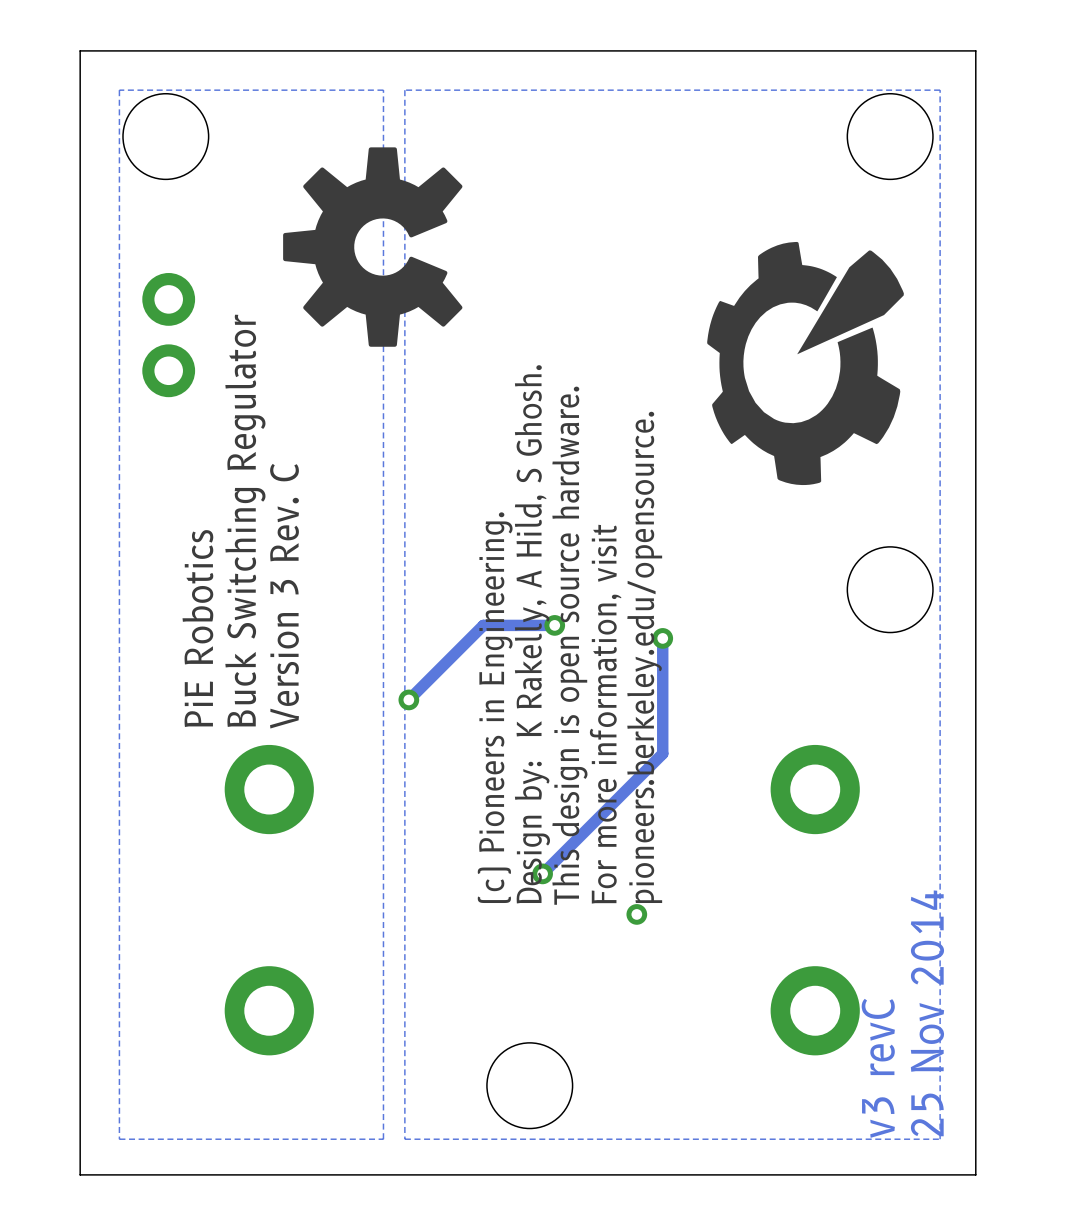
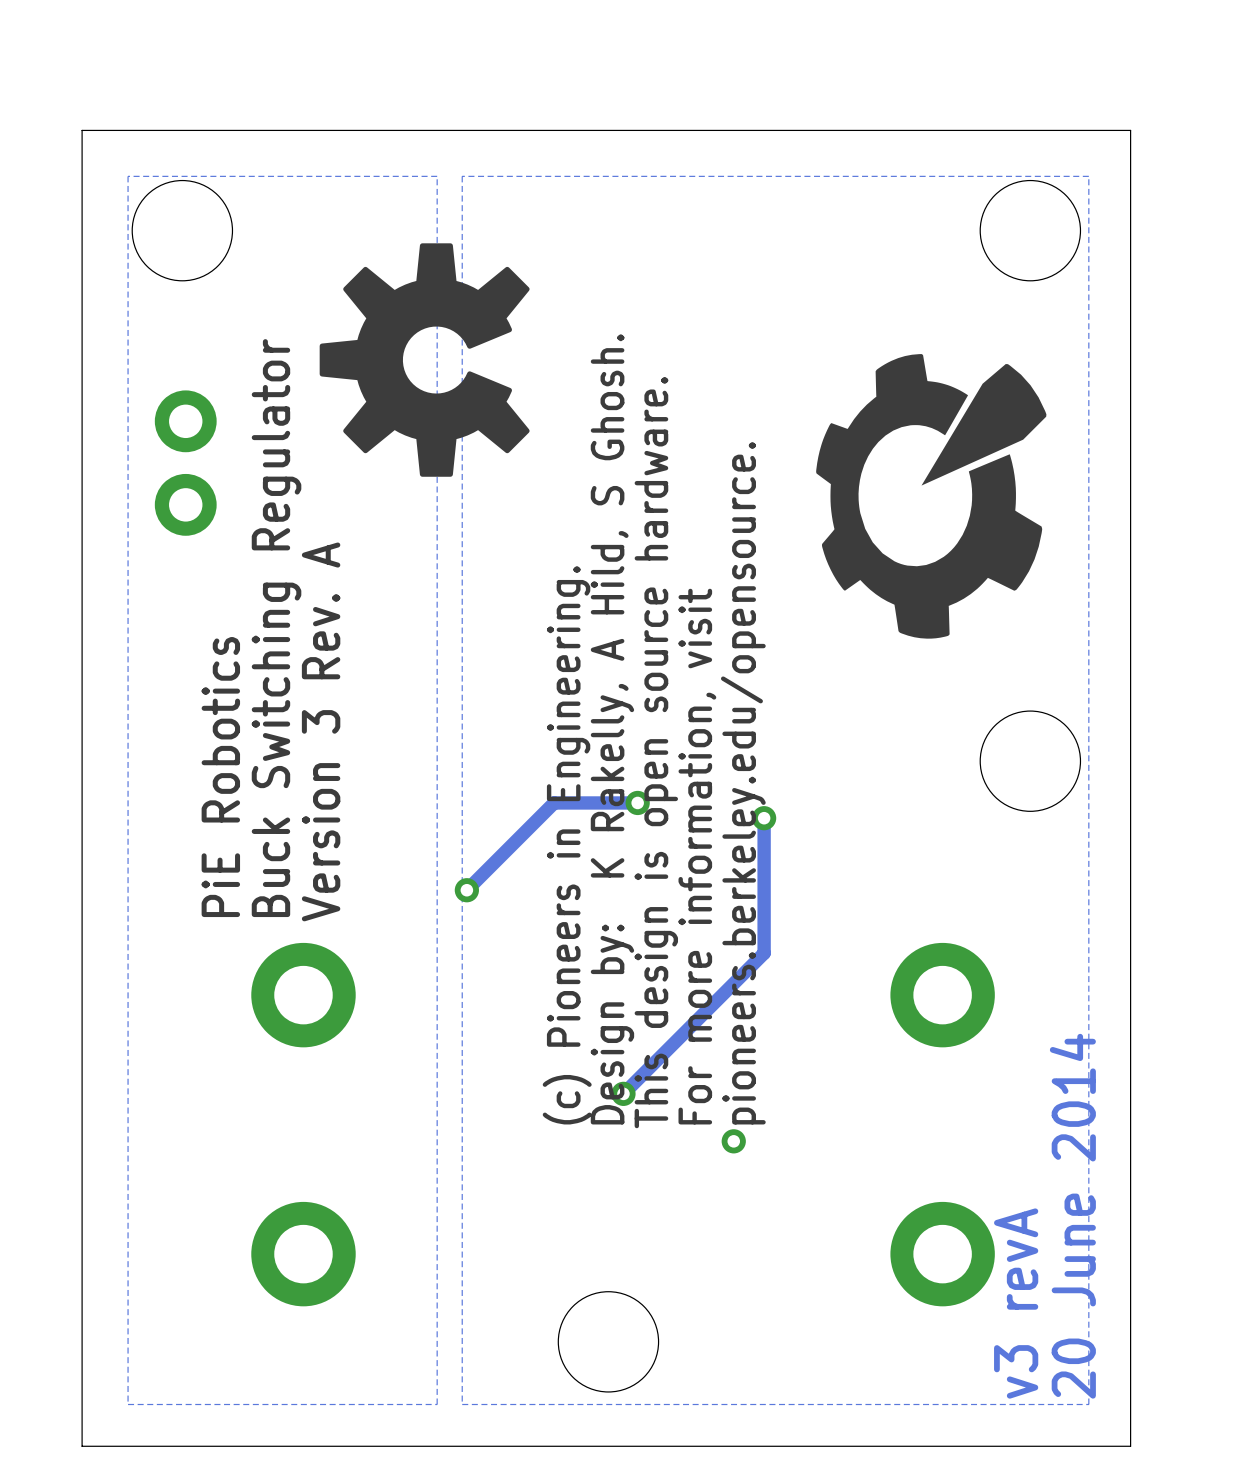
text: Version 3 Rev. C (284, 596) -> Version 3 Rev. A (321, 731)
text: 25 Nov 2014 (927, 1013) -> 20 June 2014 (1072, 1216)
text: v3 revC (878, 1068) -> v3 revA (1016, 1303)

